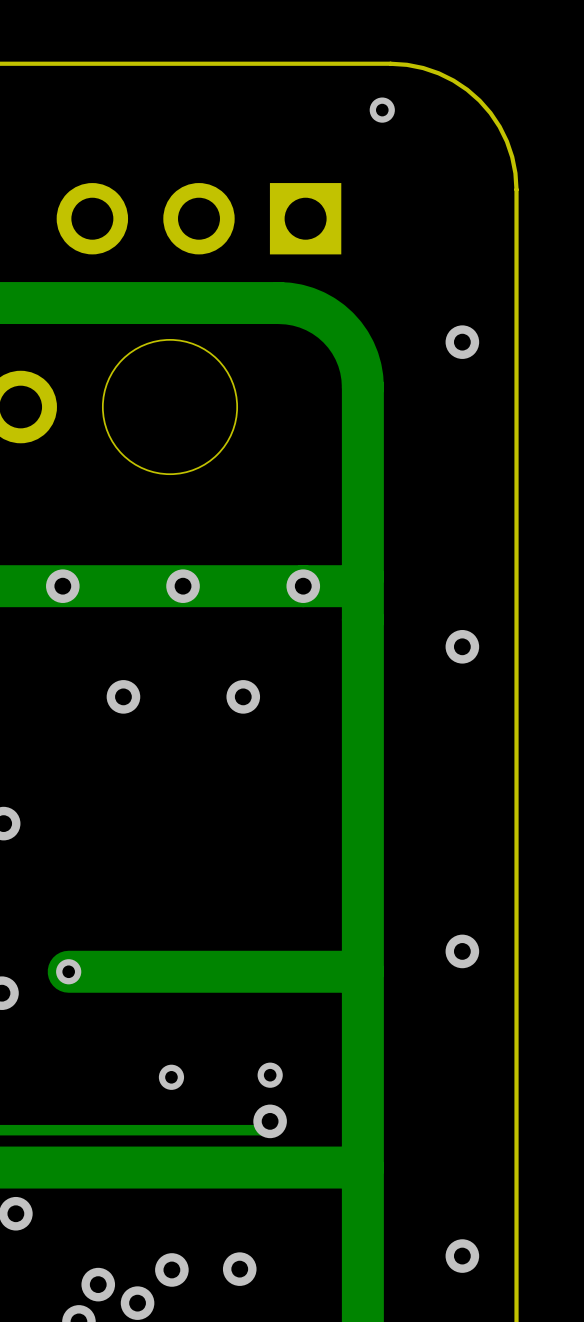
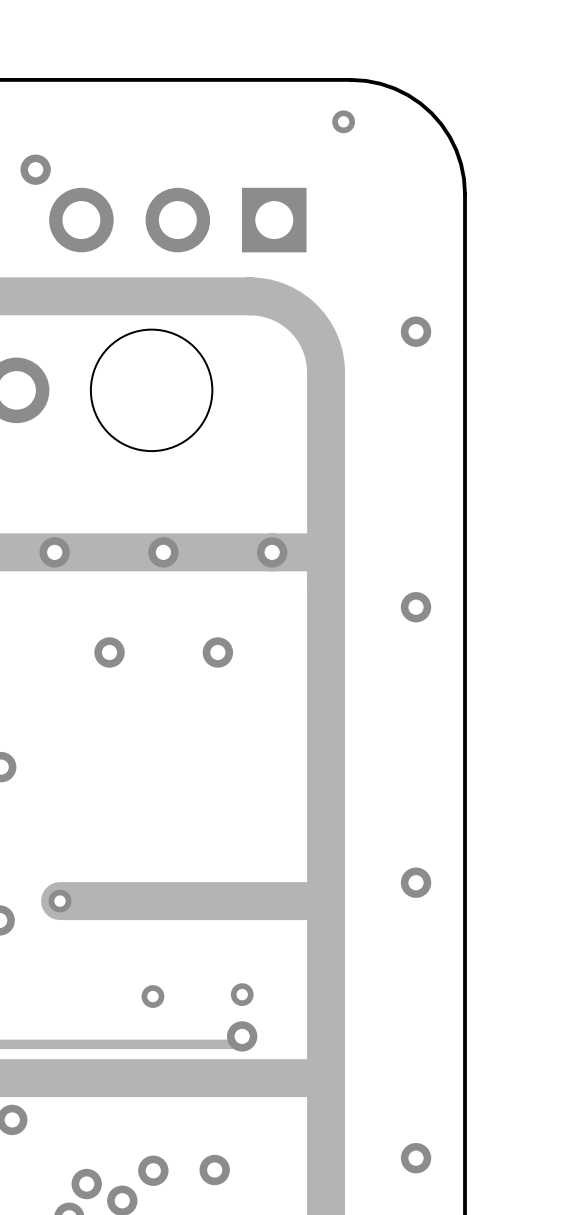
via: none -> (35, 169)

